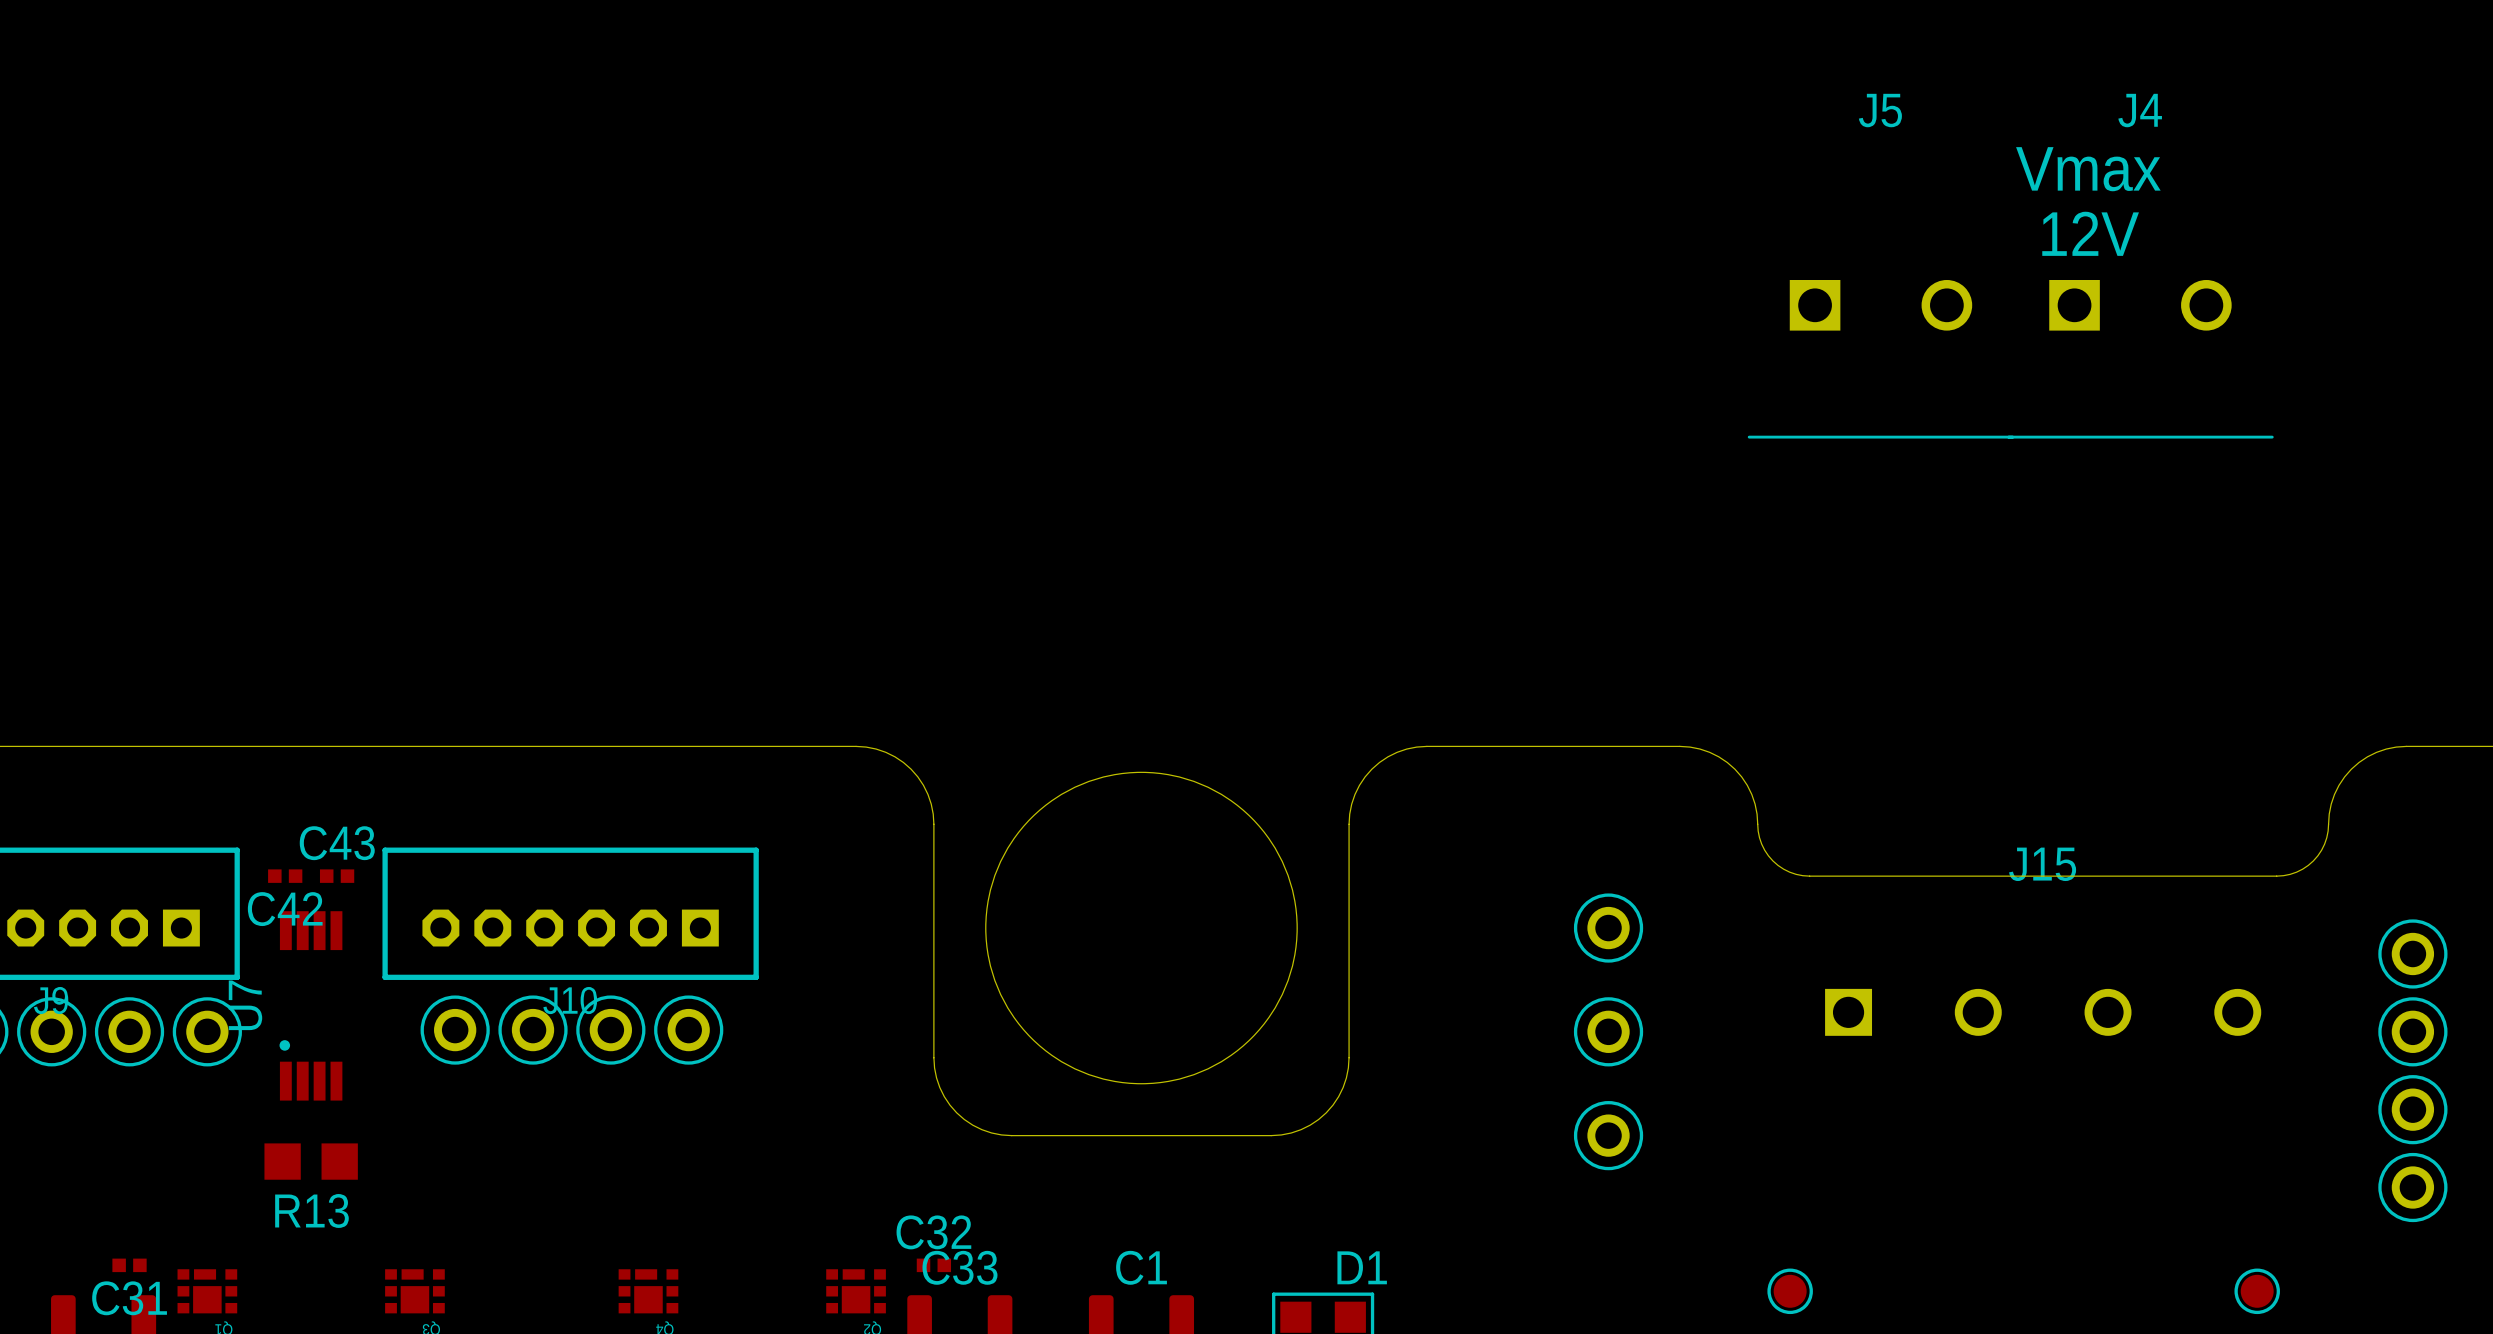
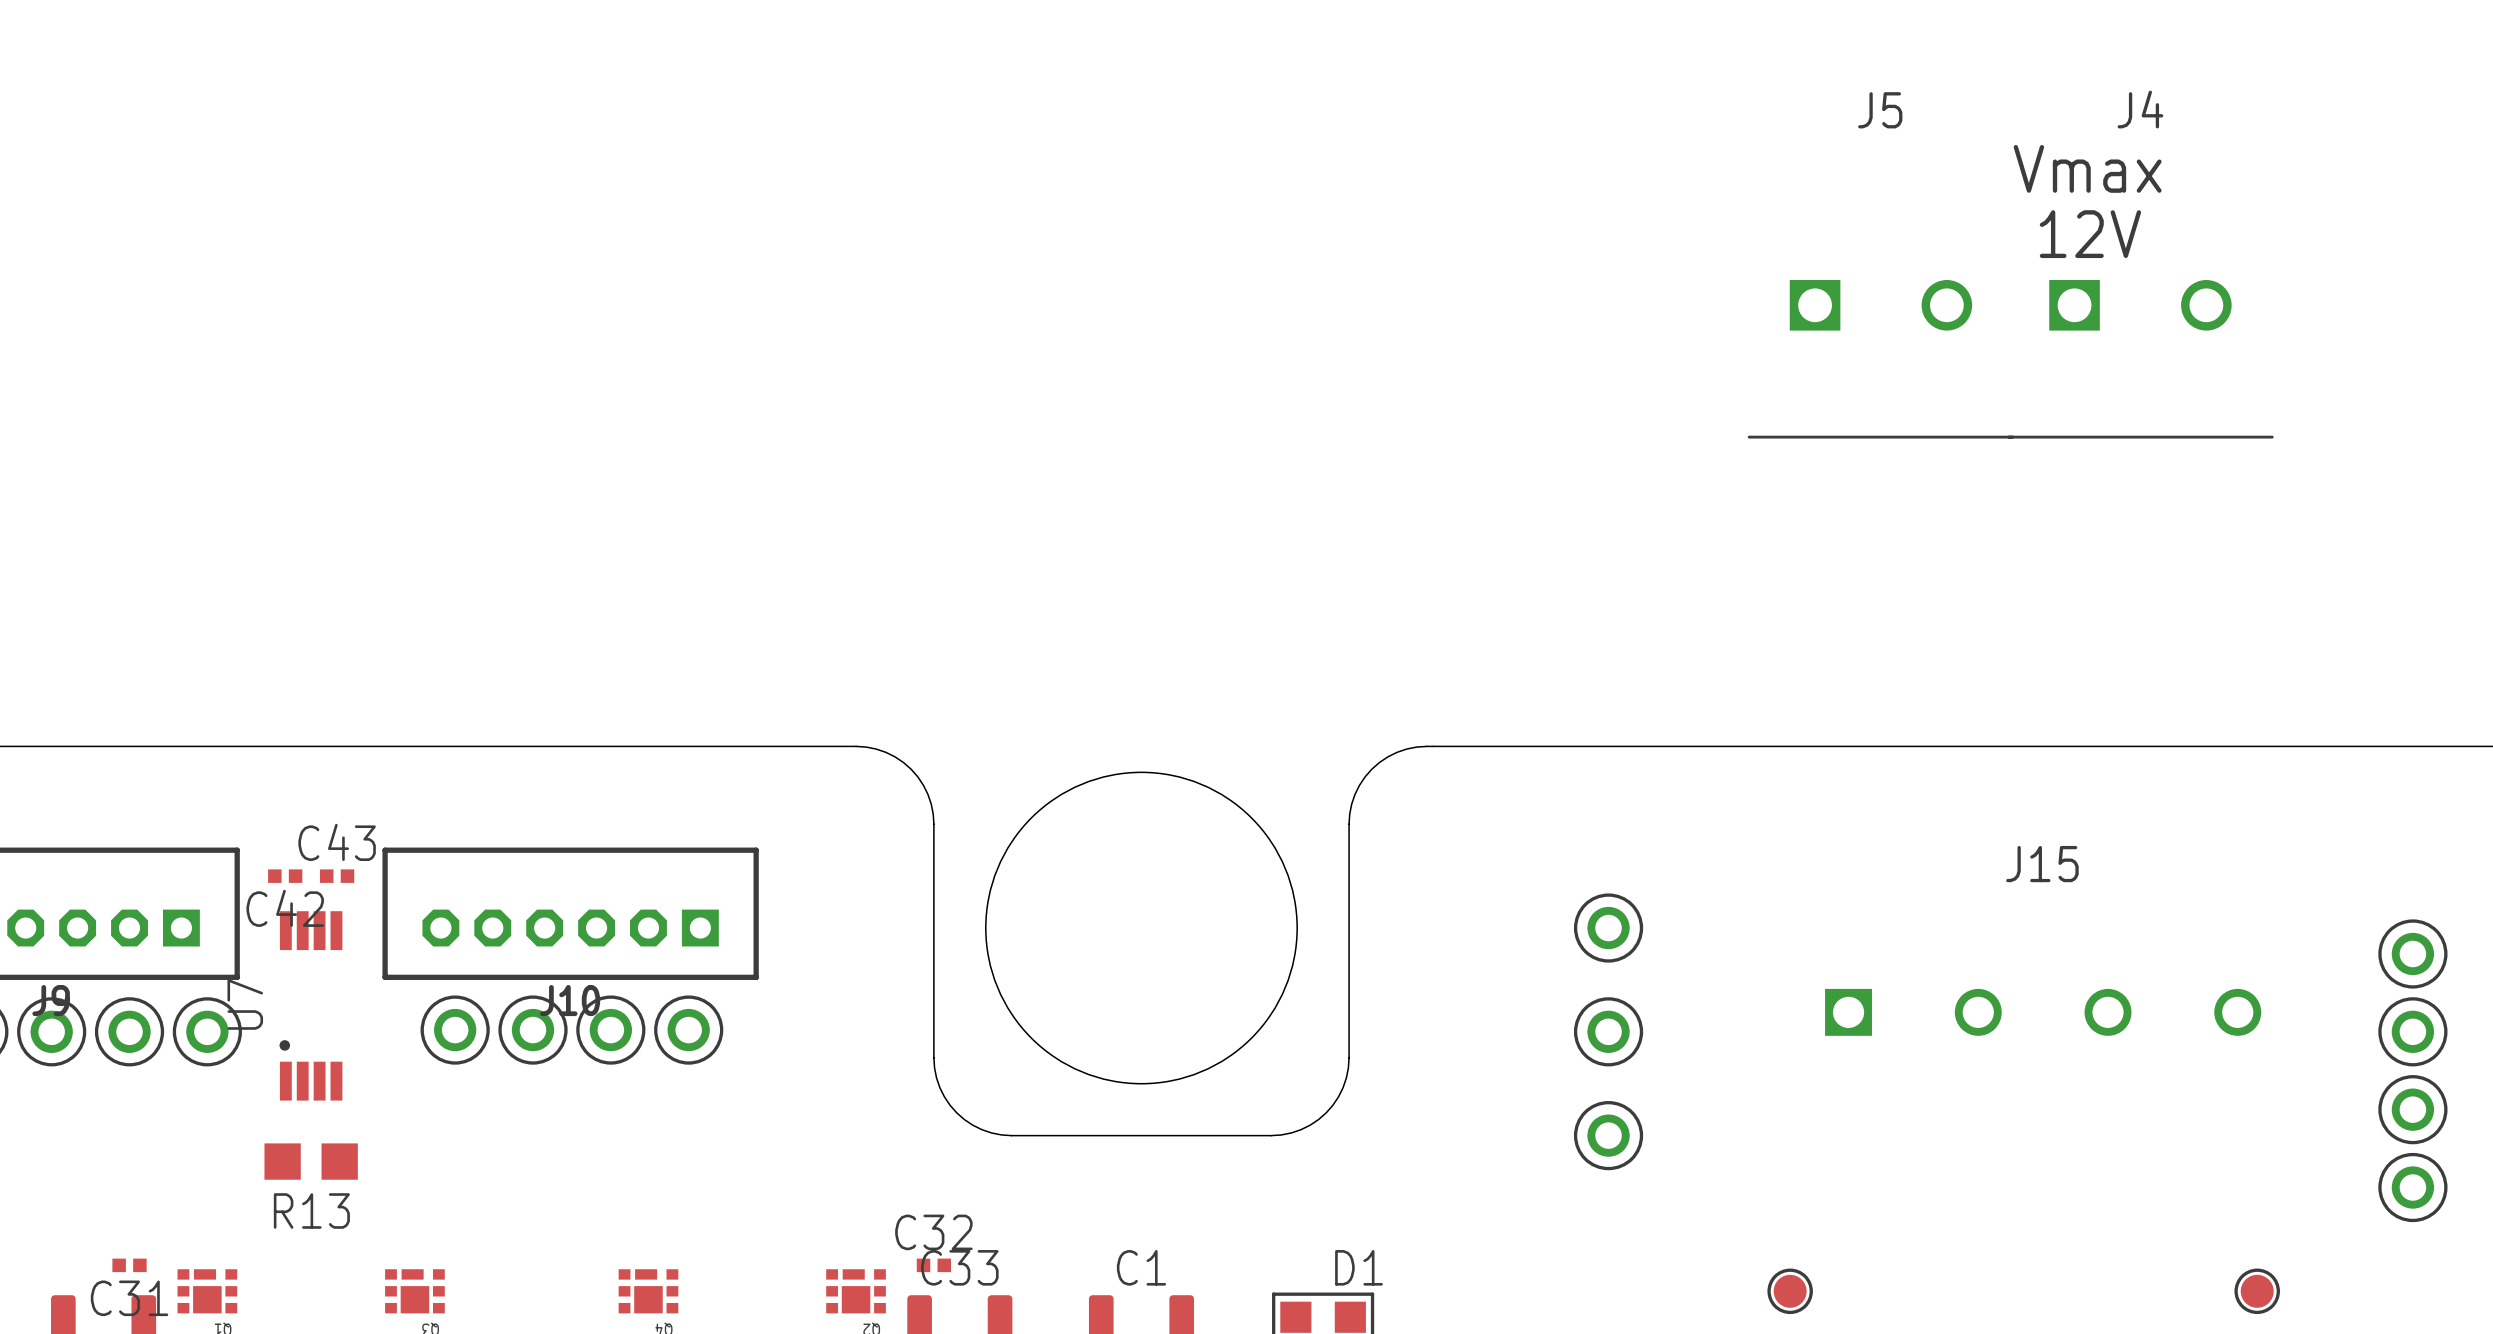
board edge: (1679, 746) (1709, 752) (1734, 769) (1751, 794) (1757, 814) (1759, 837) (1768, 855) (1778, 865) (1789, 872) (1809, 876) (2276, 876) (2290, 874) (2308, 865) (2321, 850) (2326, 837) (2329, 814) (2334, 794) (2351, 769) (2376, 752) (2406, 746) -> (1679, 746) (2406, 746)

